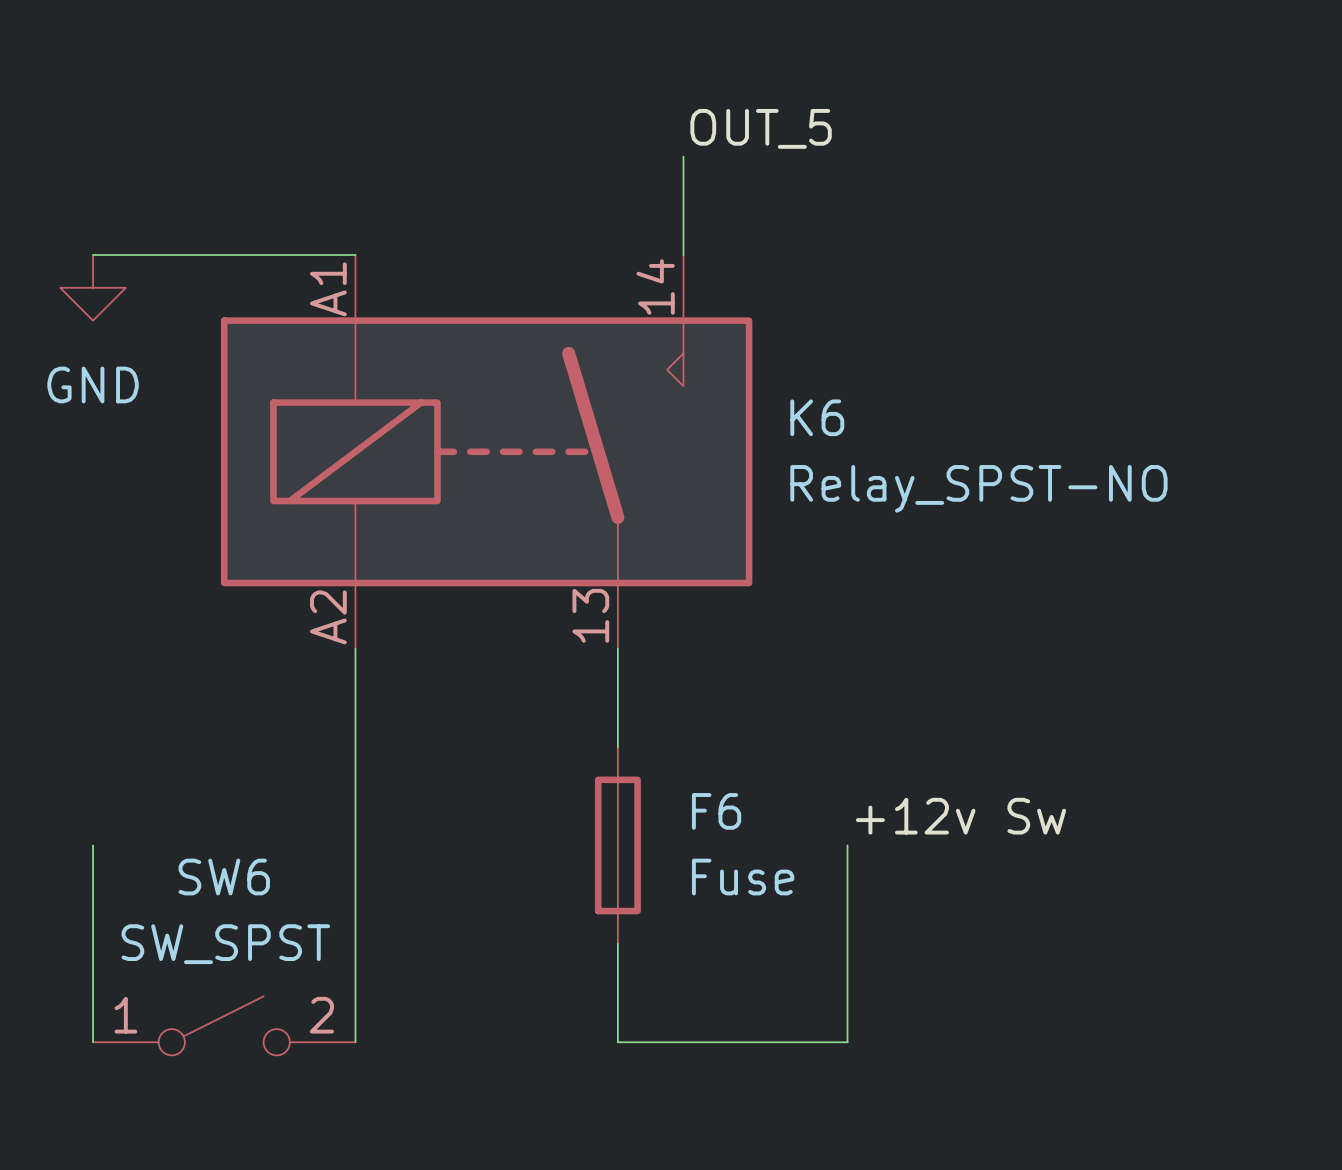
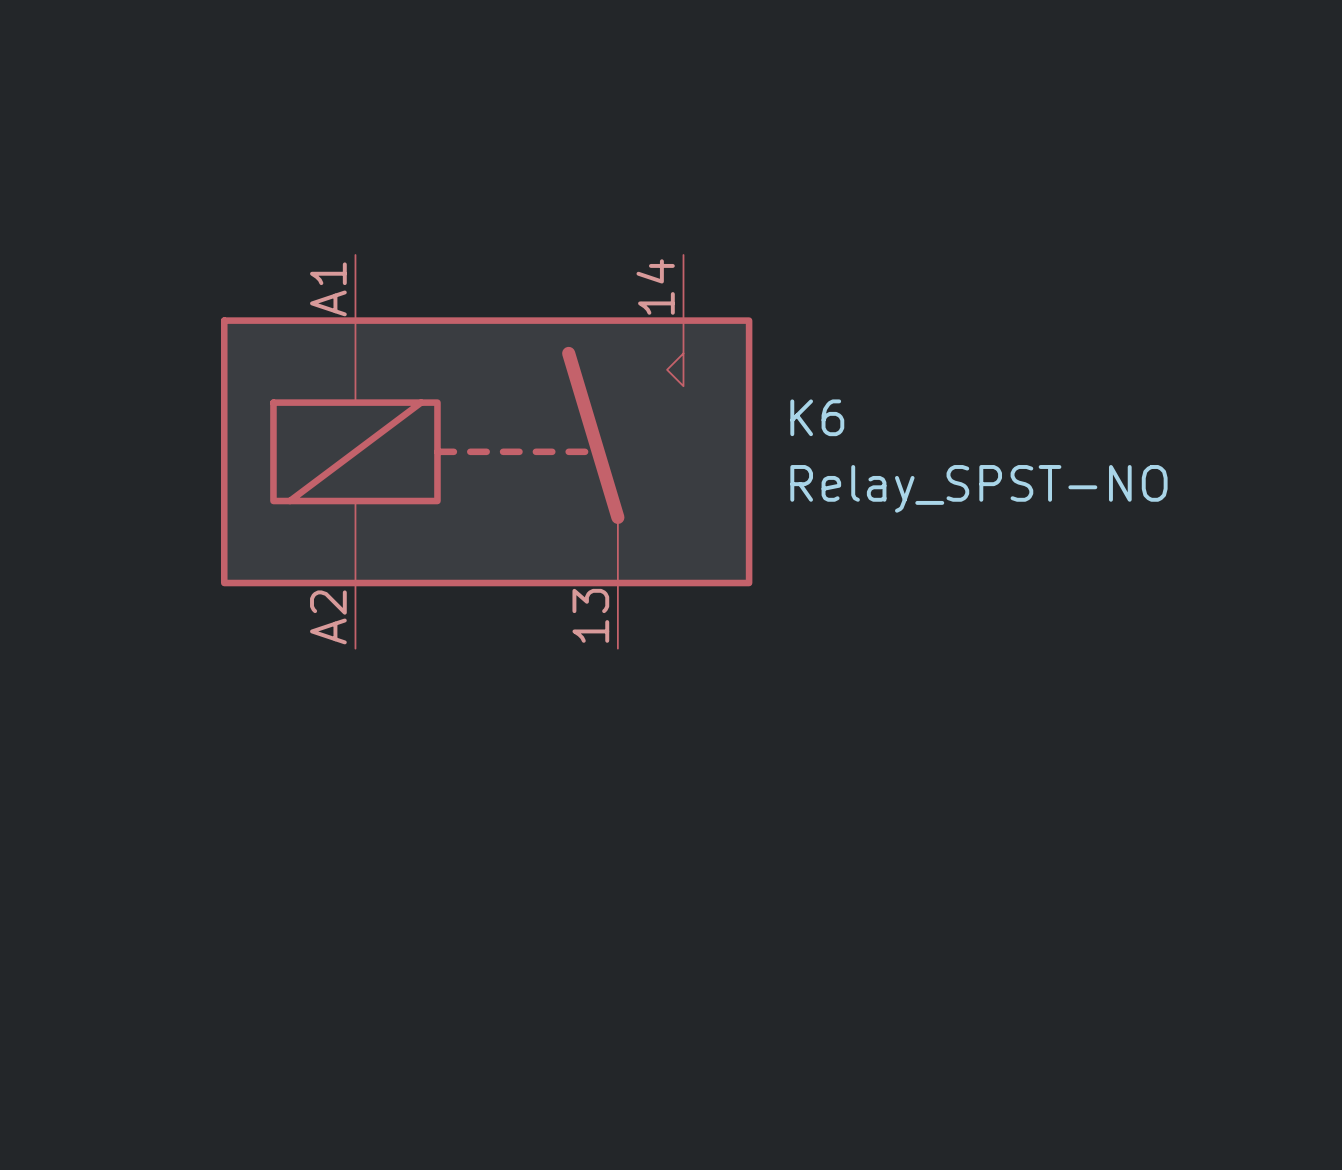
label: OUT_5 (761, 128) -> none
wire: (683, 156) (683, 254) -> none
wire: (93, 254) (355, 254) -> none
power symbol: GND (93, 287) -> none
wire: (355, 648) (355, 1042) -> none
wire: (617, 648) (617, 747) -> none
label: +12v Sw (961, 816) -> none
wire: (93, 845) (93, 1042) -> none
F6: Fuse (617, 845) -> none
wire: (847, 845) (847, 1042) (617, 1042) (617, 943) -> none
SW6: SW_SPST (224, 1025) -> none

